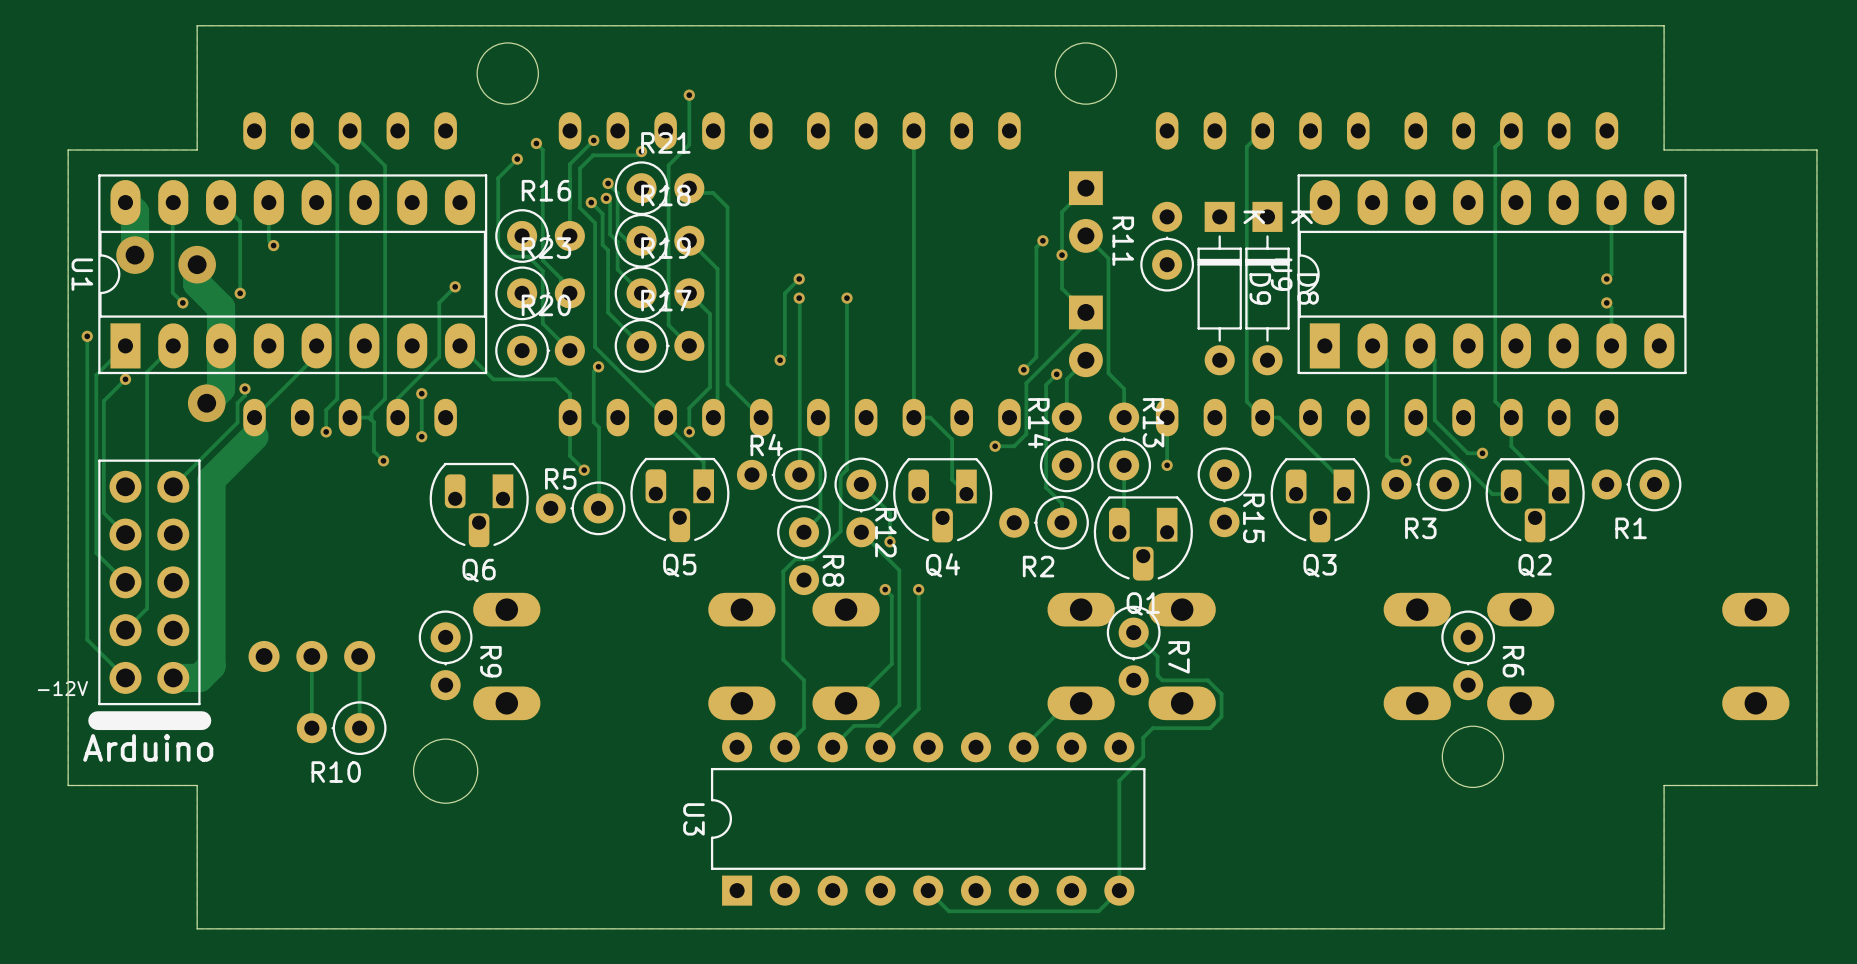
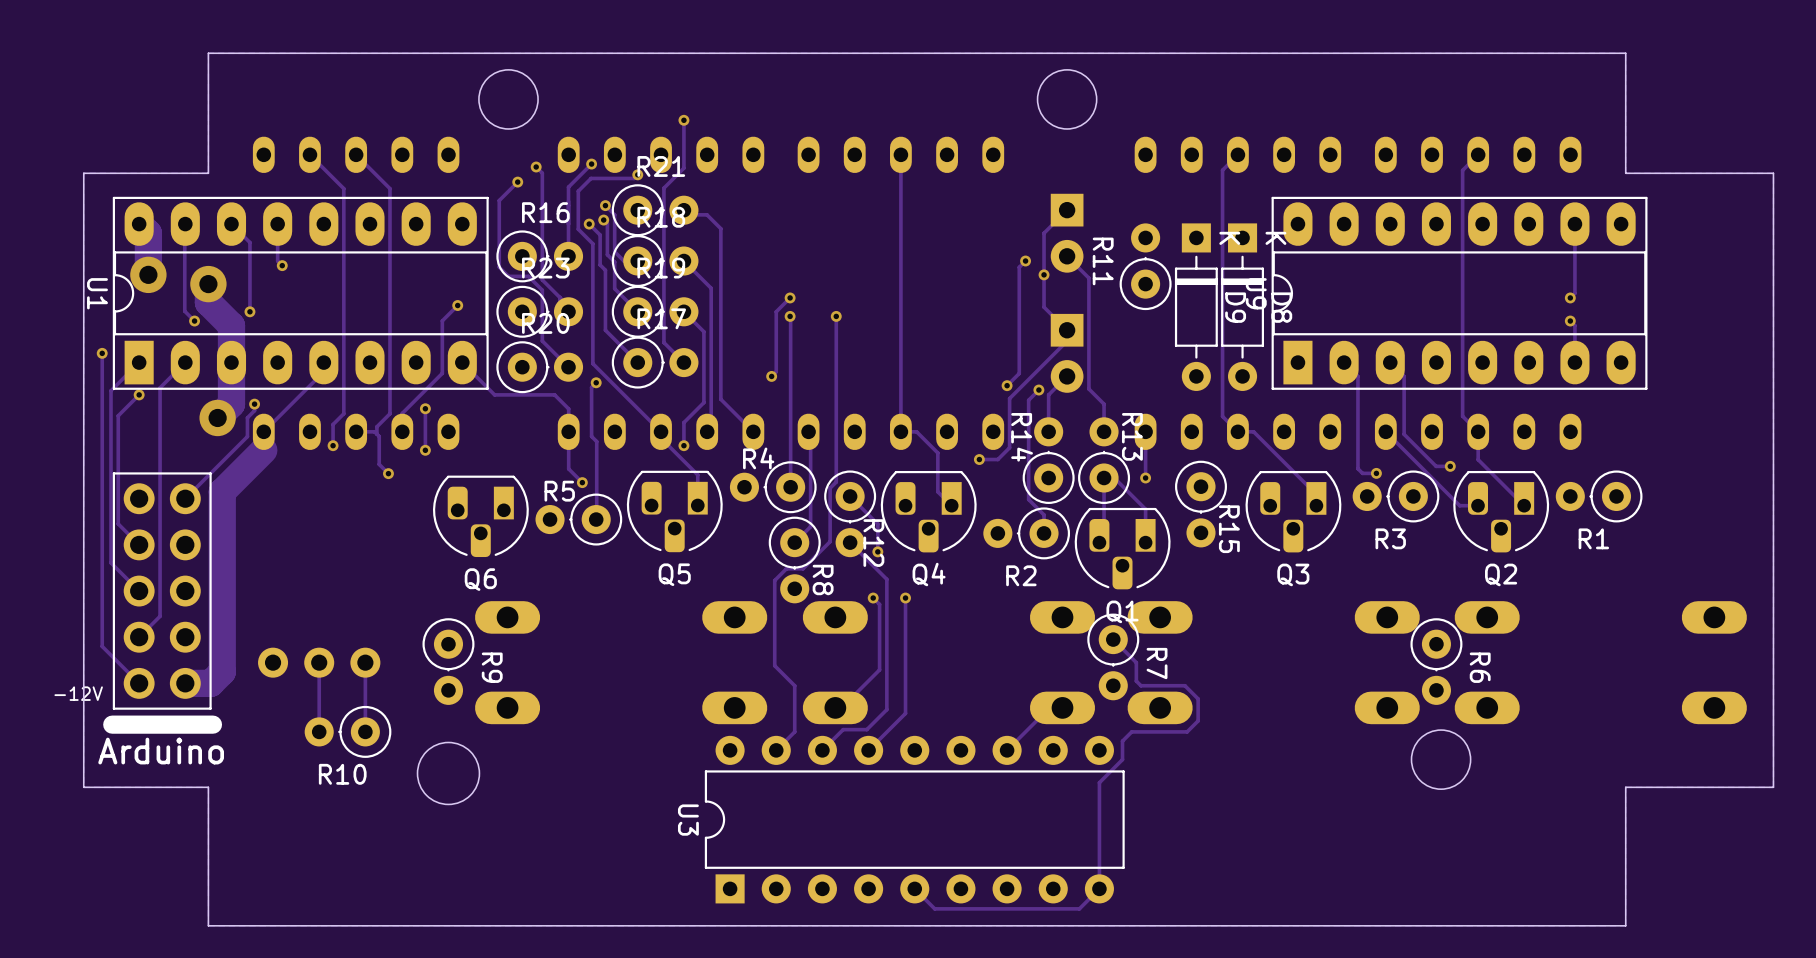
track: none -> (1109, 472) (1145, 509) (1145, 542)

